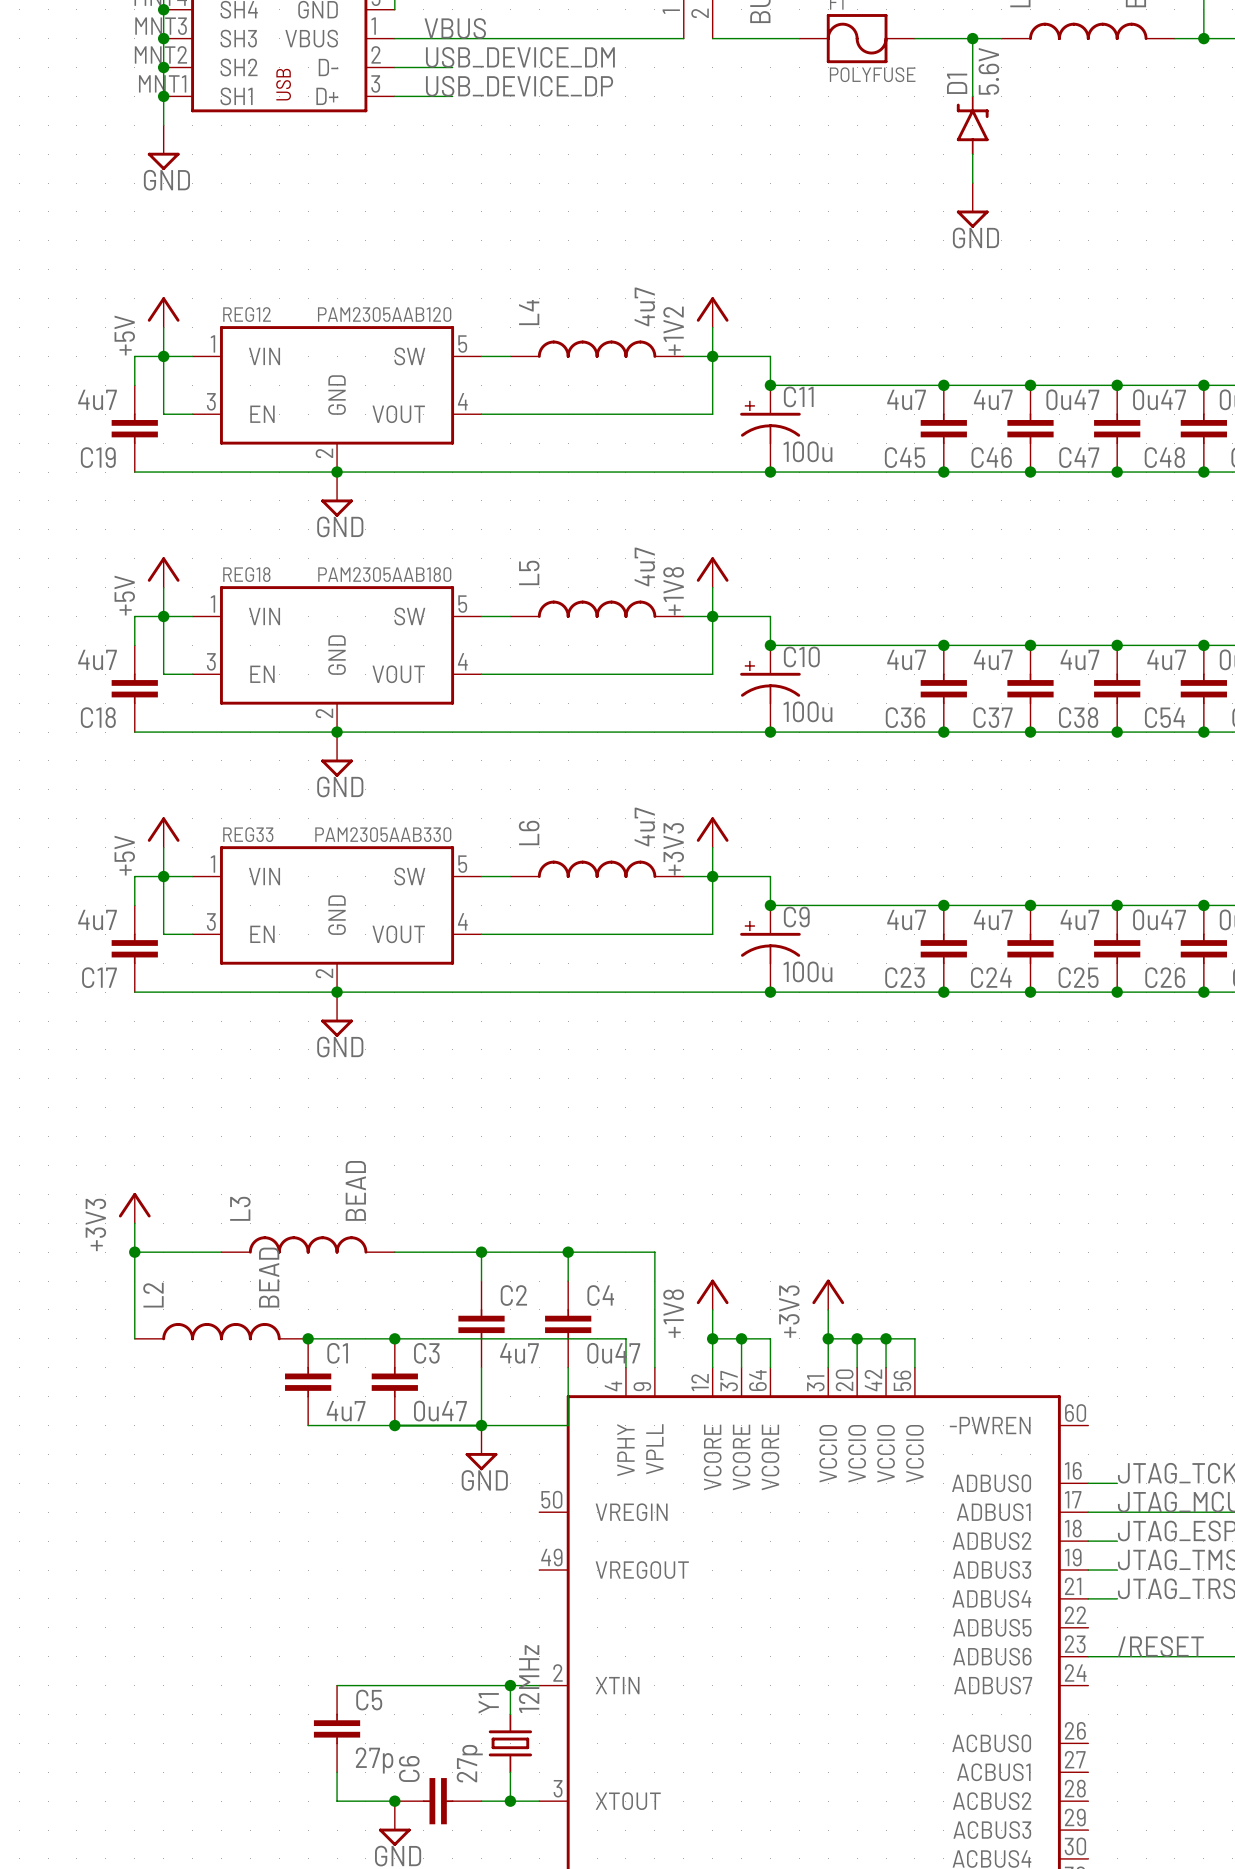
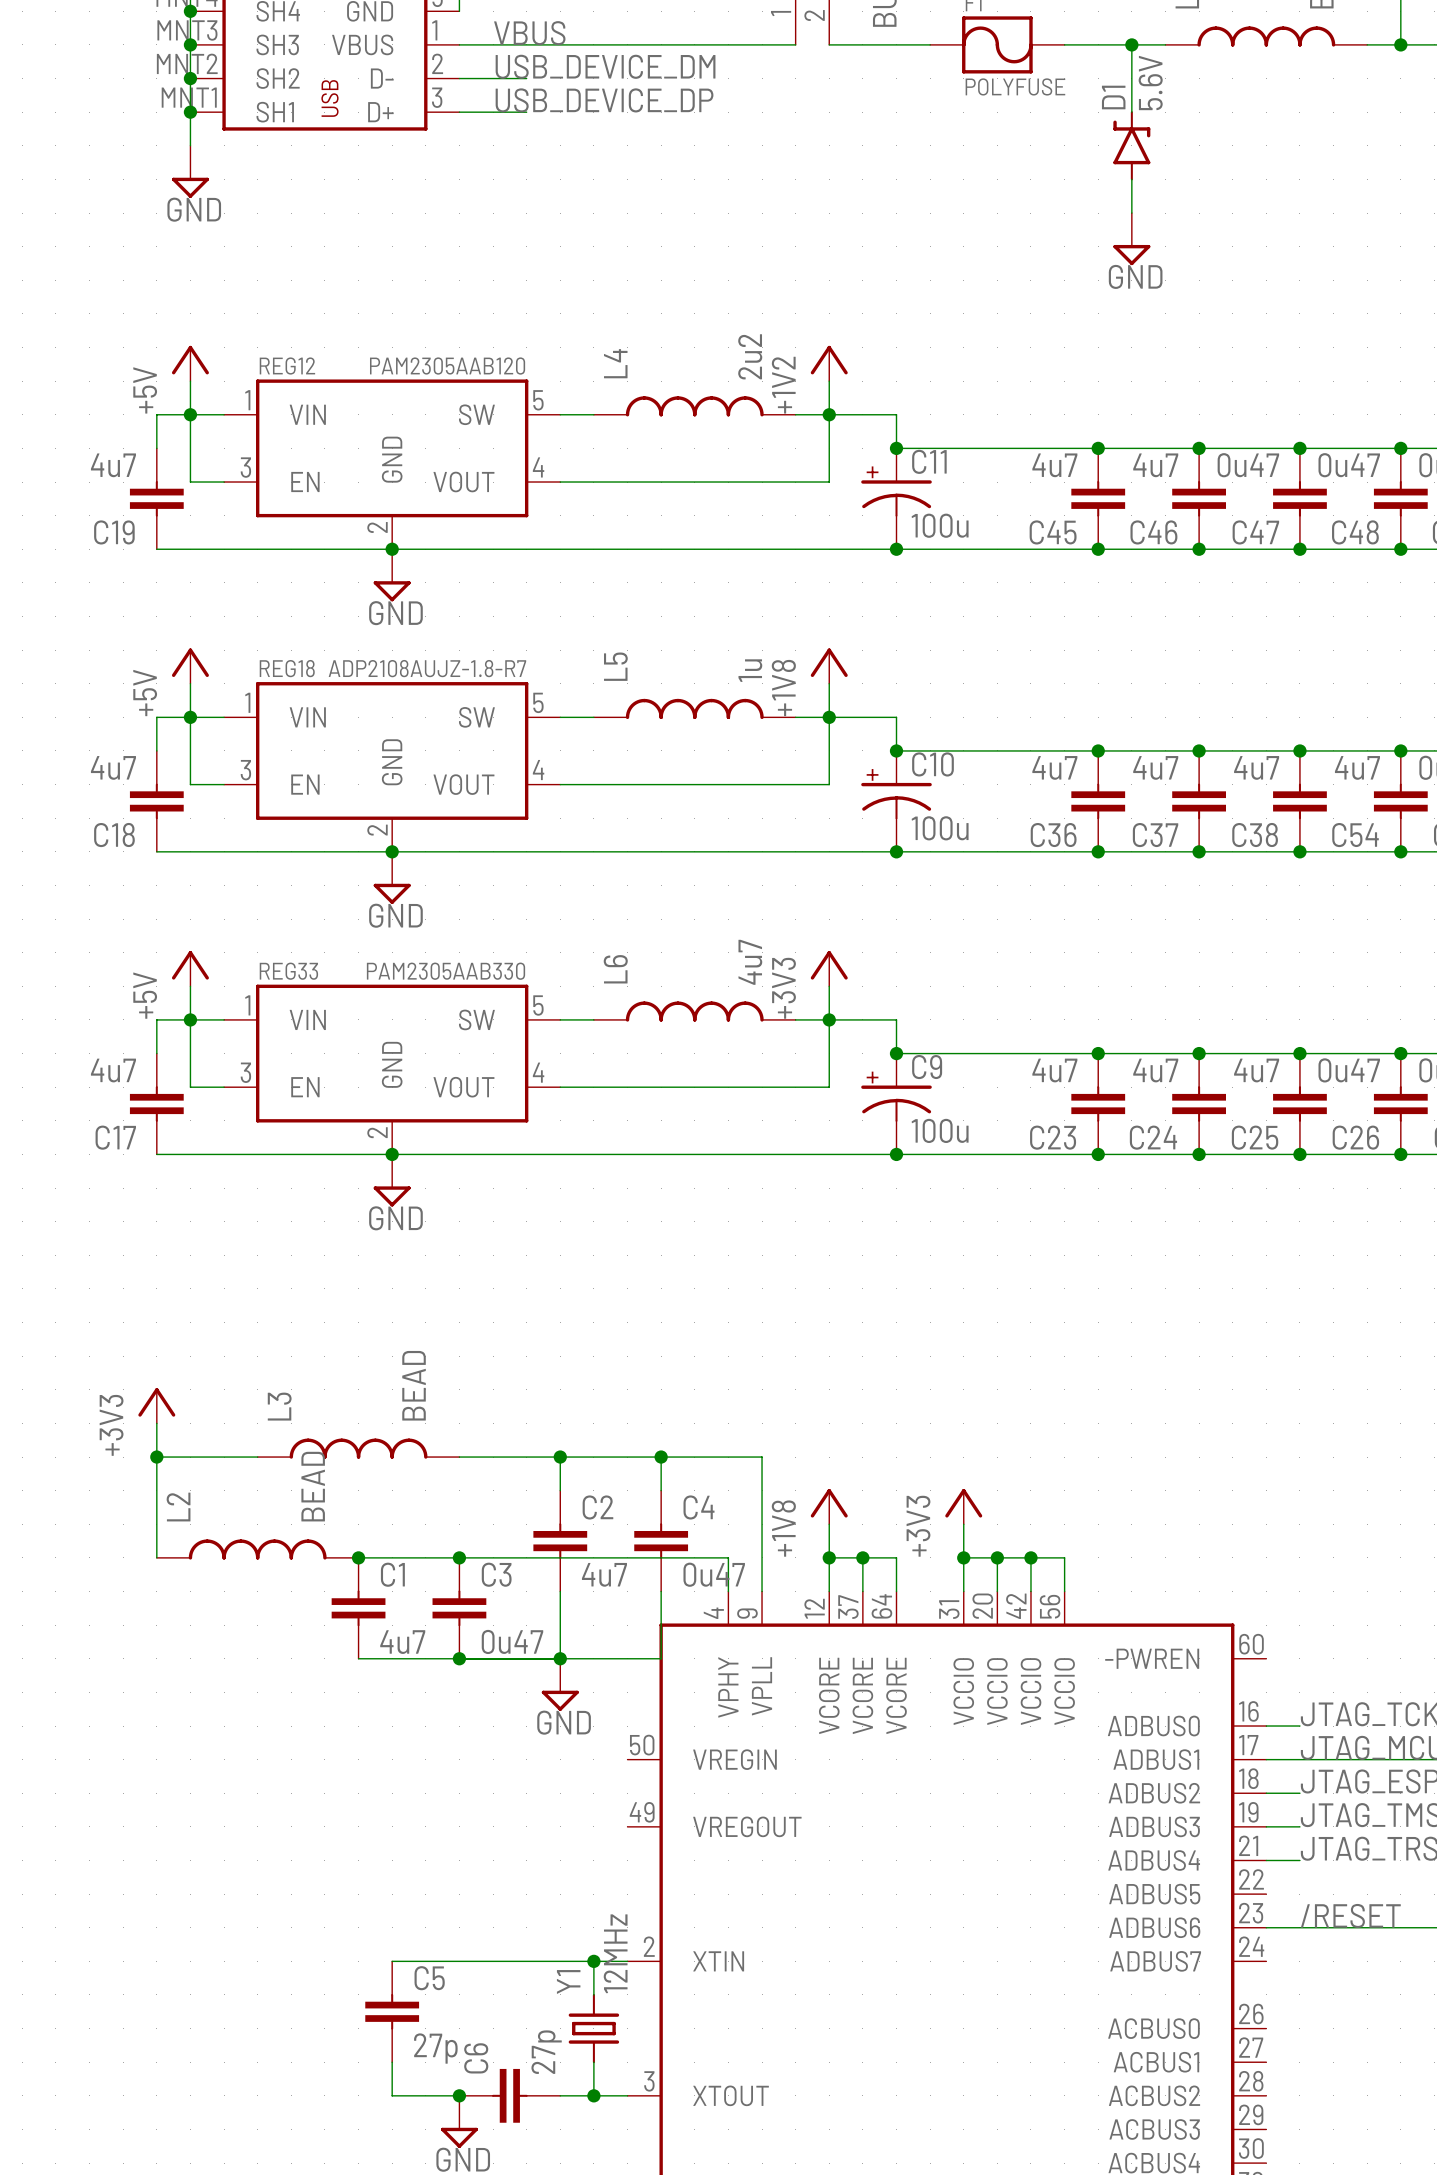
L4 value: 4u7 (644, 306) -> 2u2 (750, 356)
L5 value: 4u7 (644, 566) -> 1u (750, 670)
REG18 value: PAM2305AAB180 (384, 574) -> ADP2108AUJZ-1.8-R7 (427, 668)

